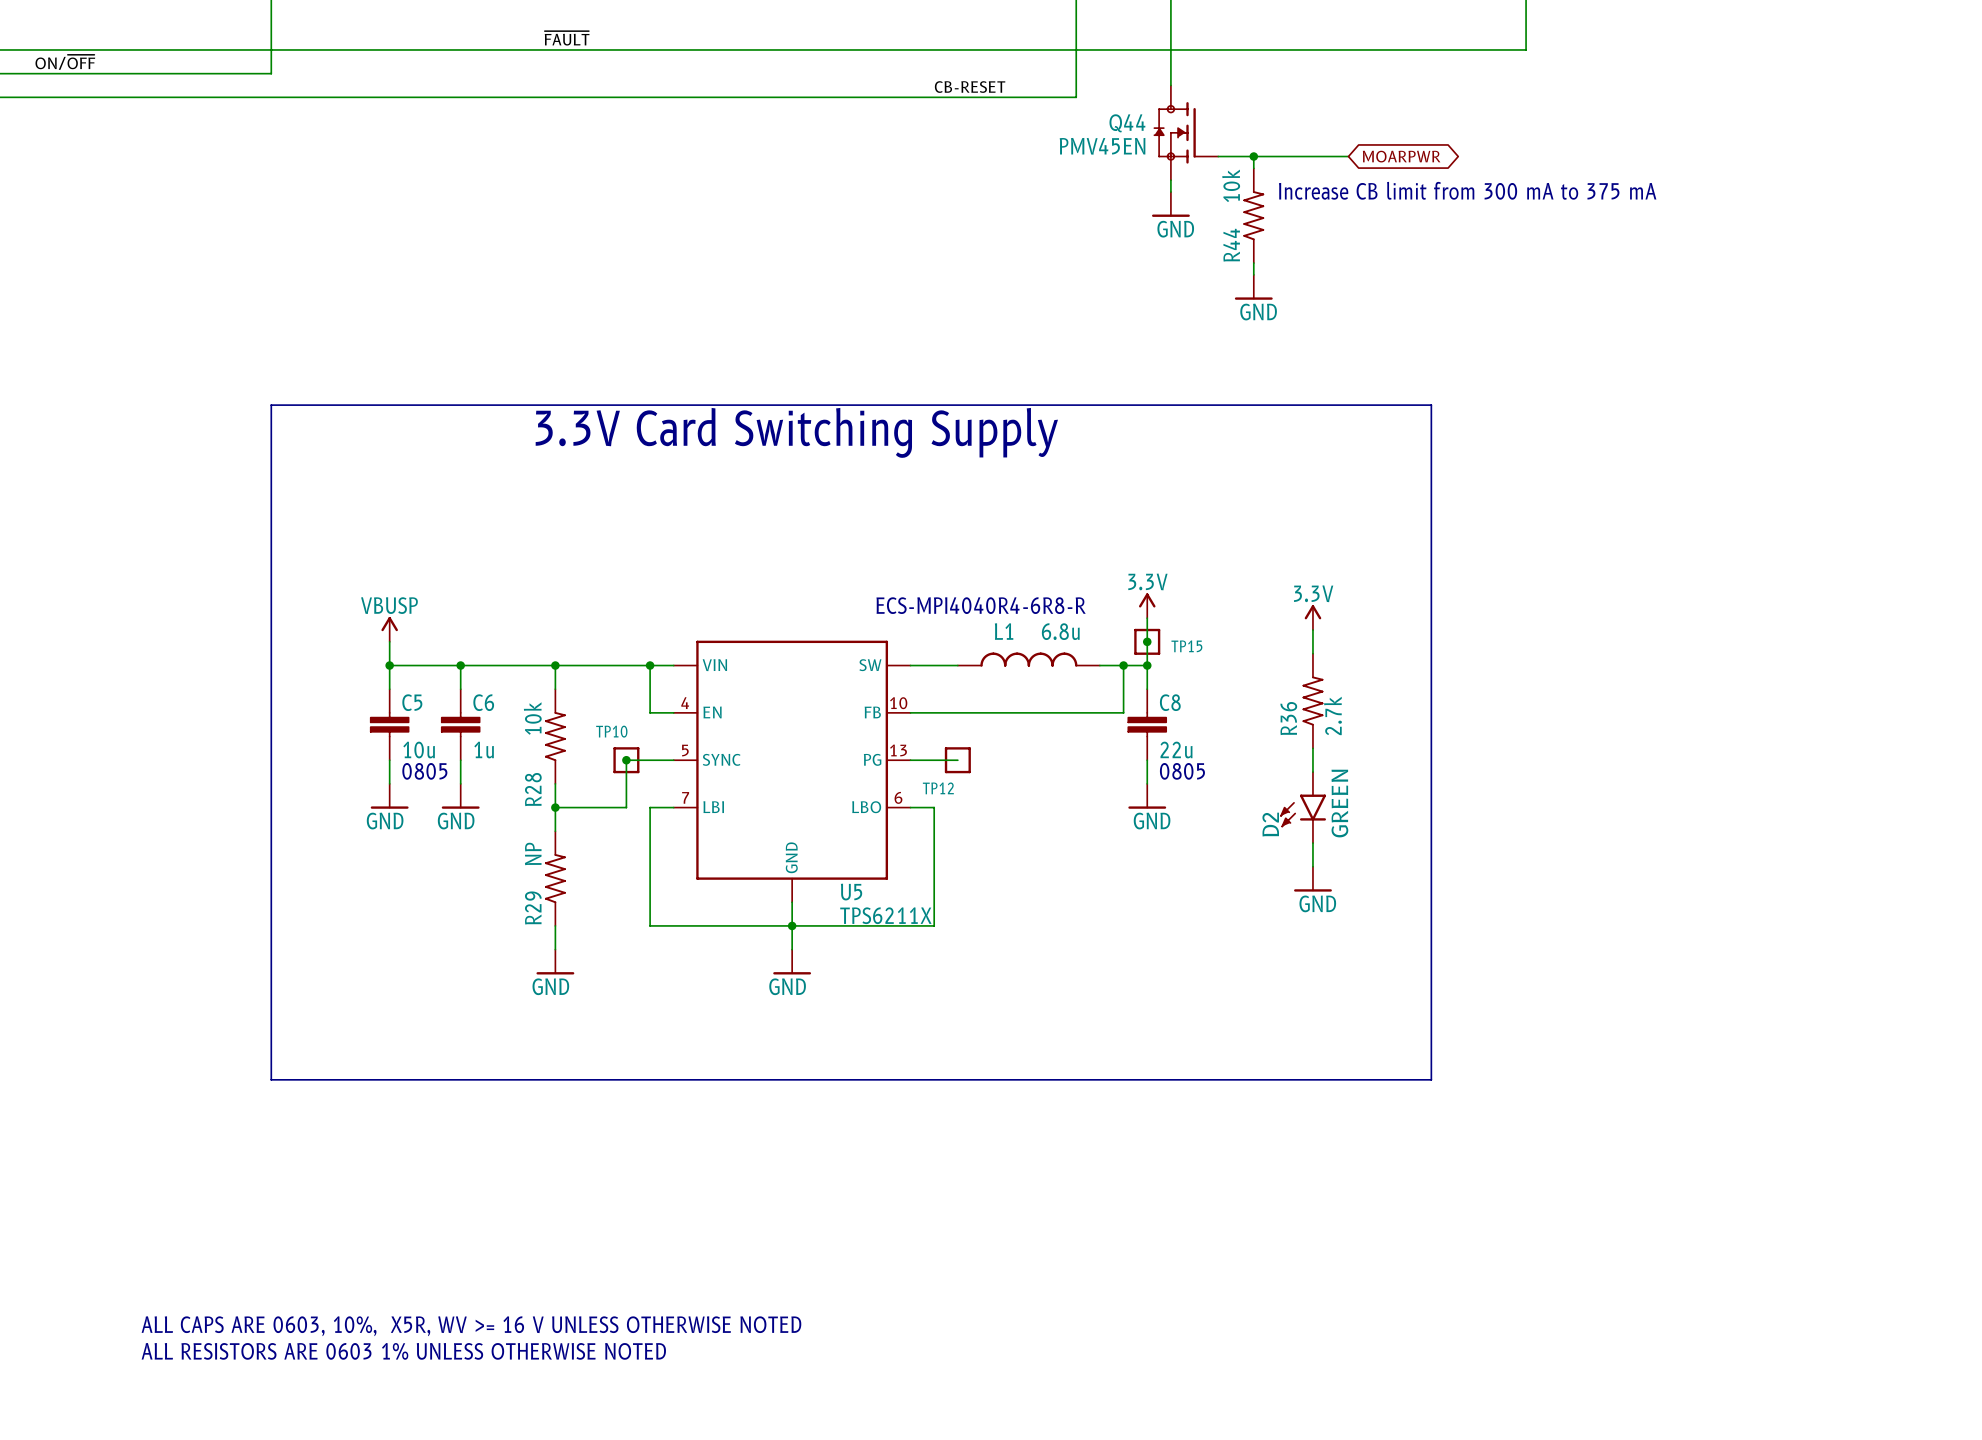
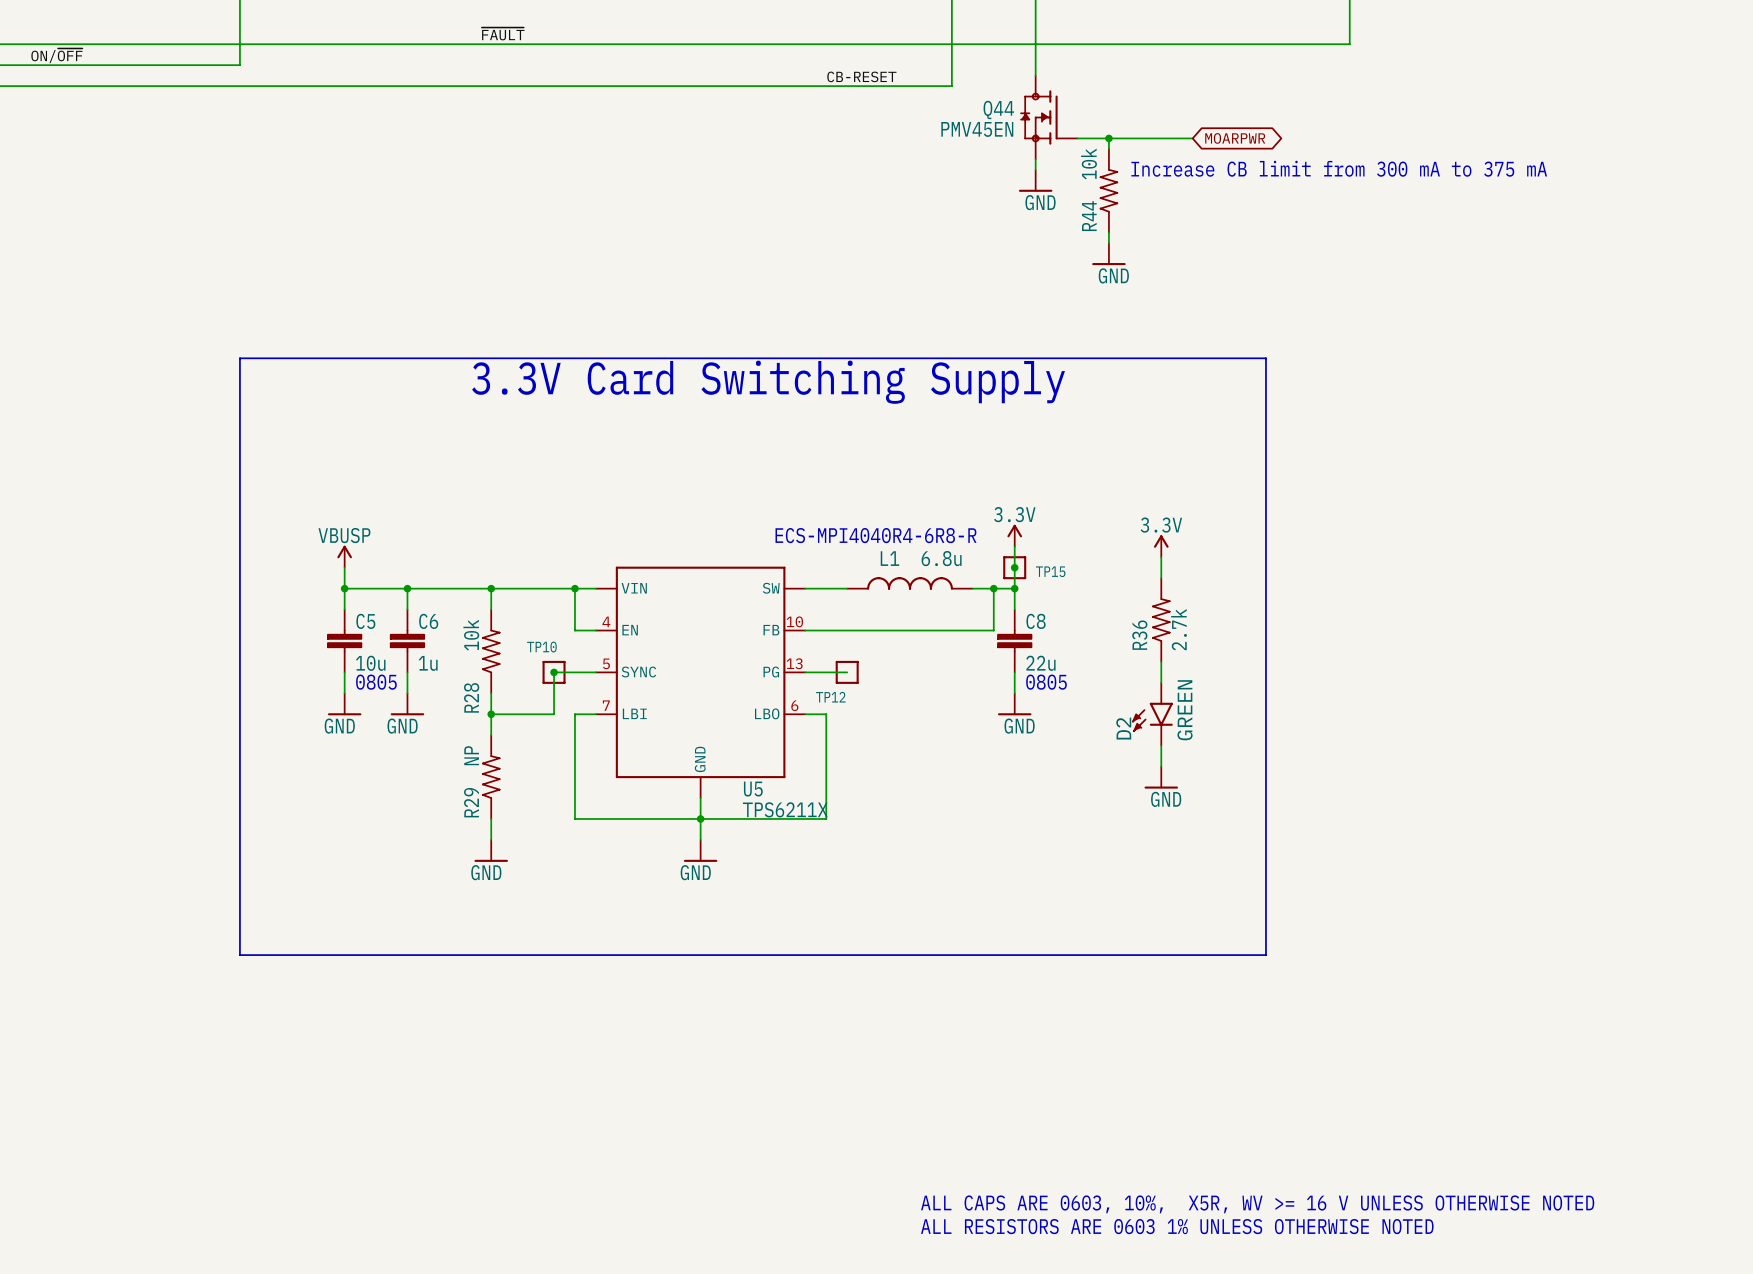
text: ALL CAPS ARE 0603, 10%, X5R, WV >= 16 V UNLESS OTHERWISE NOTED (471, 1326) -> none
text: ALL RESISTORS ARE 0603 1% UNLESS OTHERWISE NOTED (403, 1351) -> none
text: none -> ALL CAPS ARE 0603, 10%, X5R, WV >= 16 V UNLESS OTHERWISE NOTED (1257, 1204)
text: none -> ALL RESISTORS ARE 0603 1% UNLESS OTHERWISE NOTED (1177, 1226)

